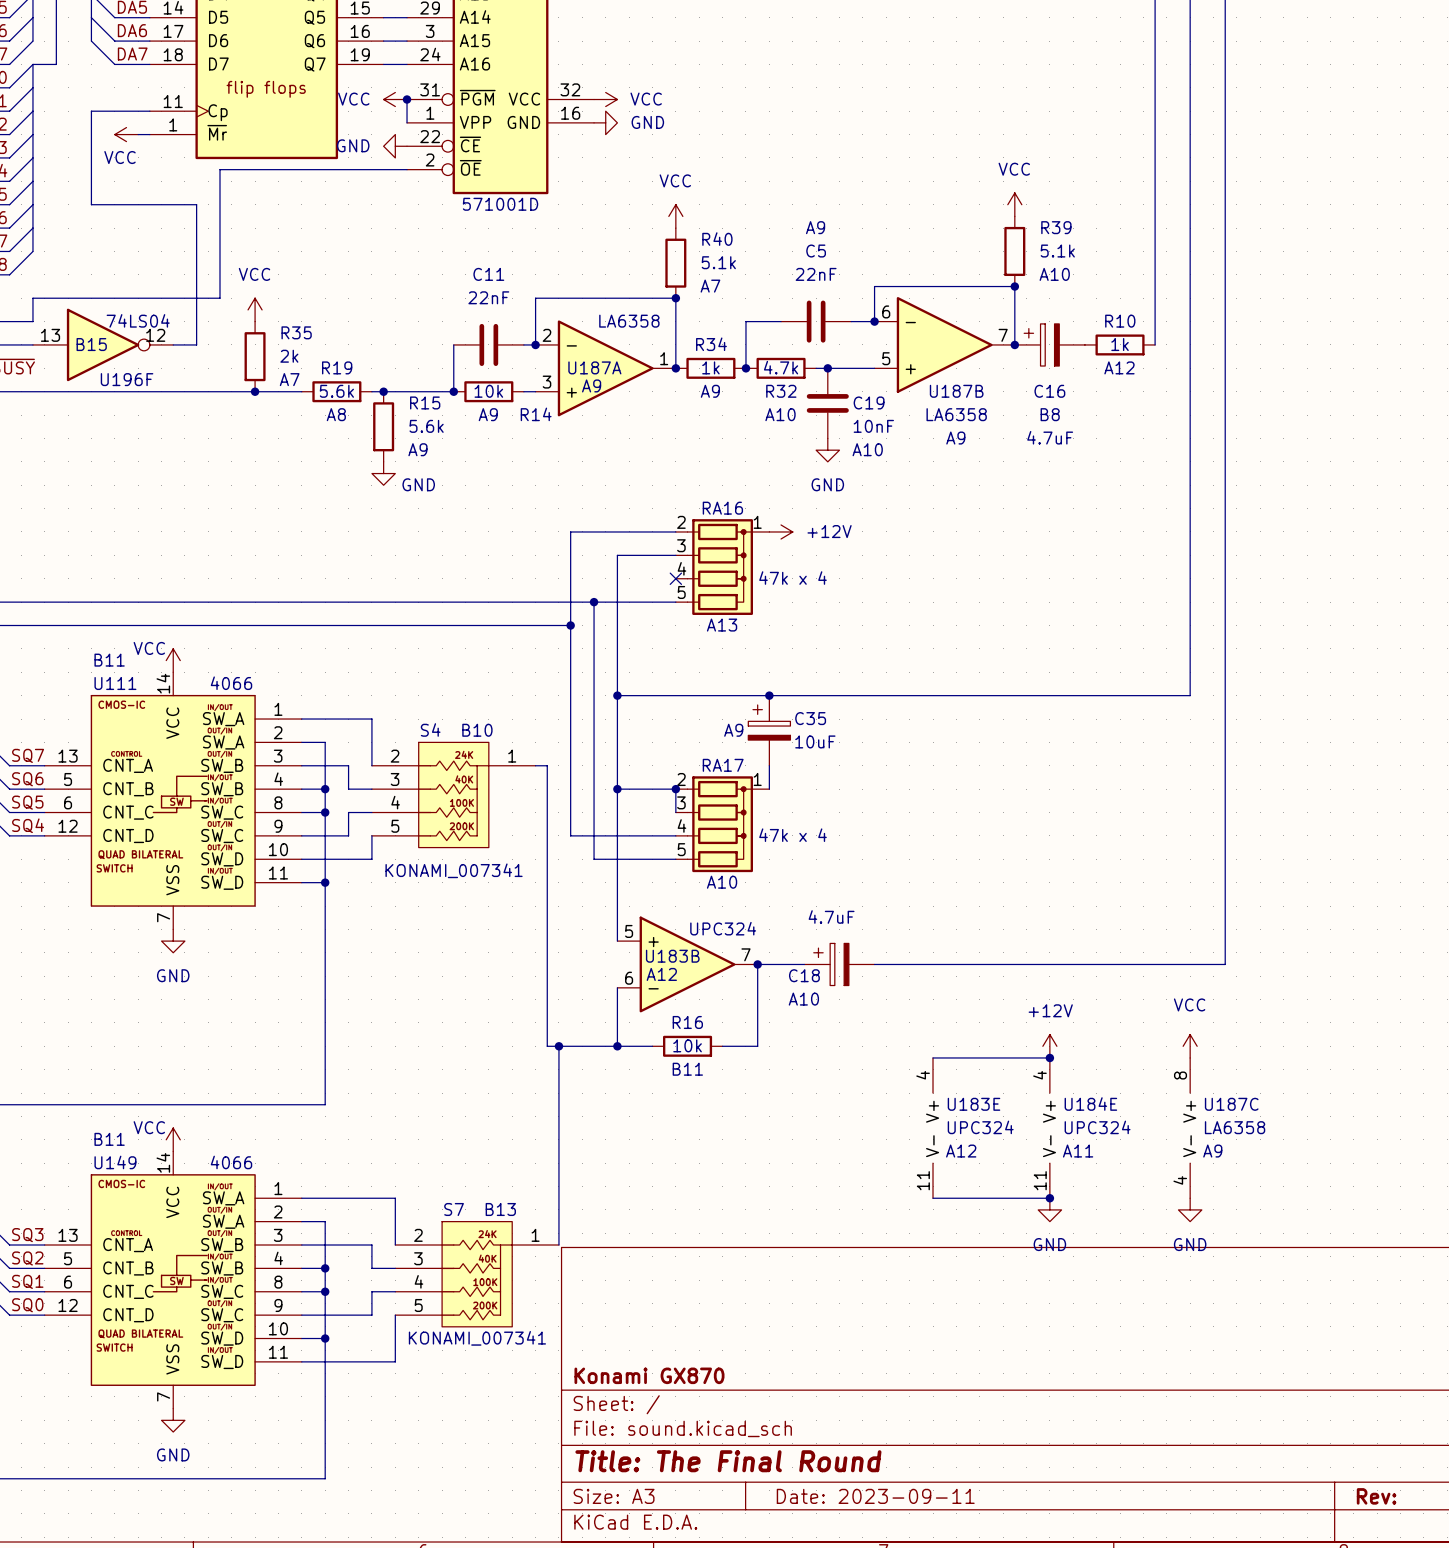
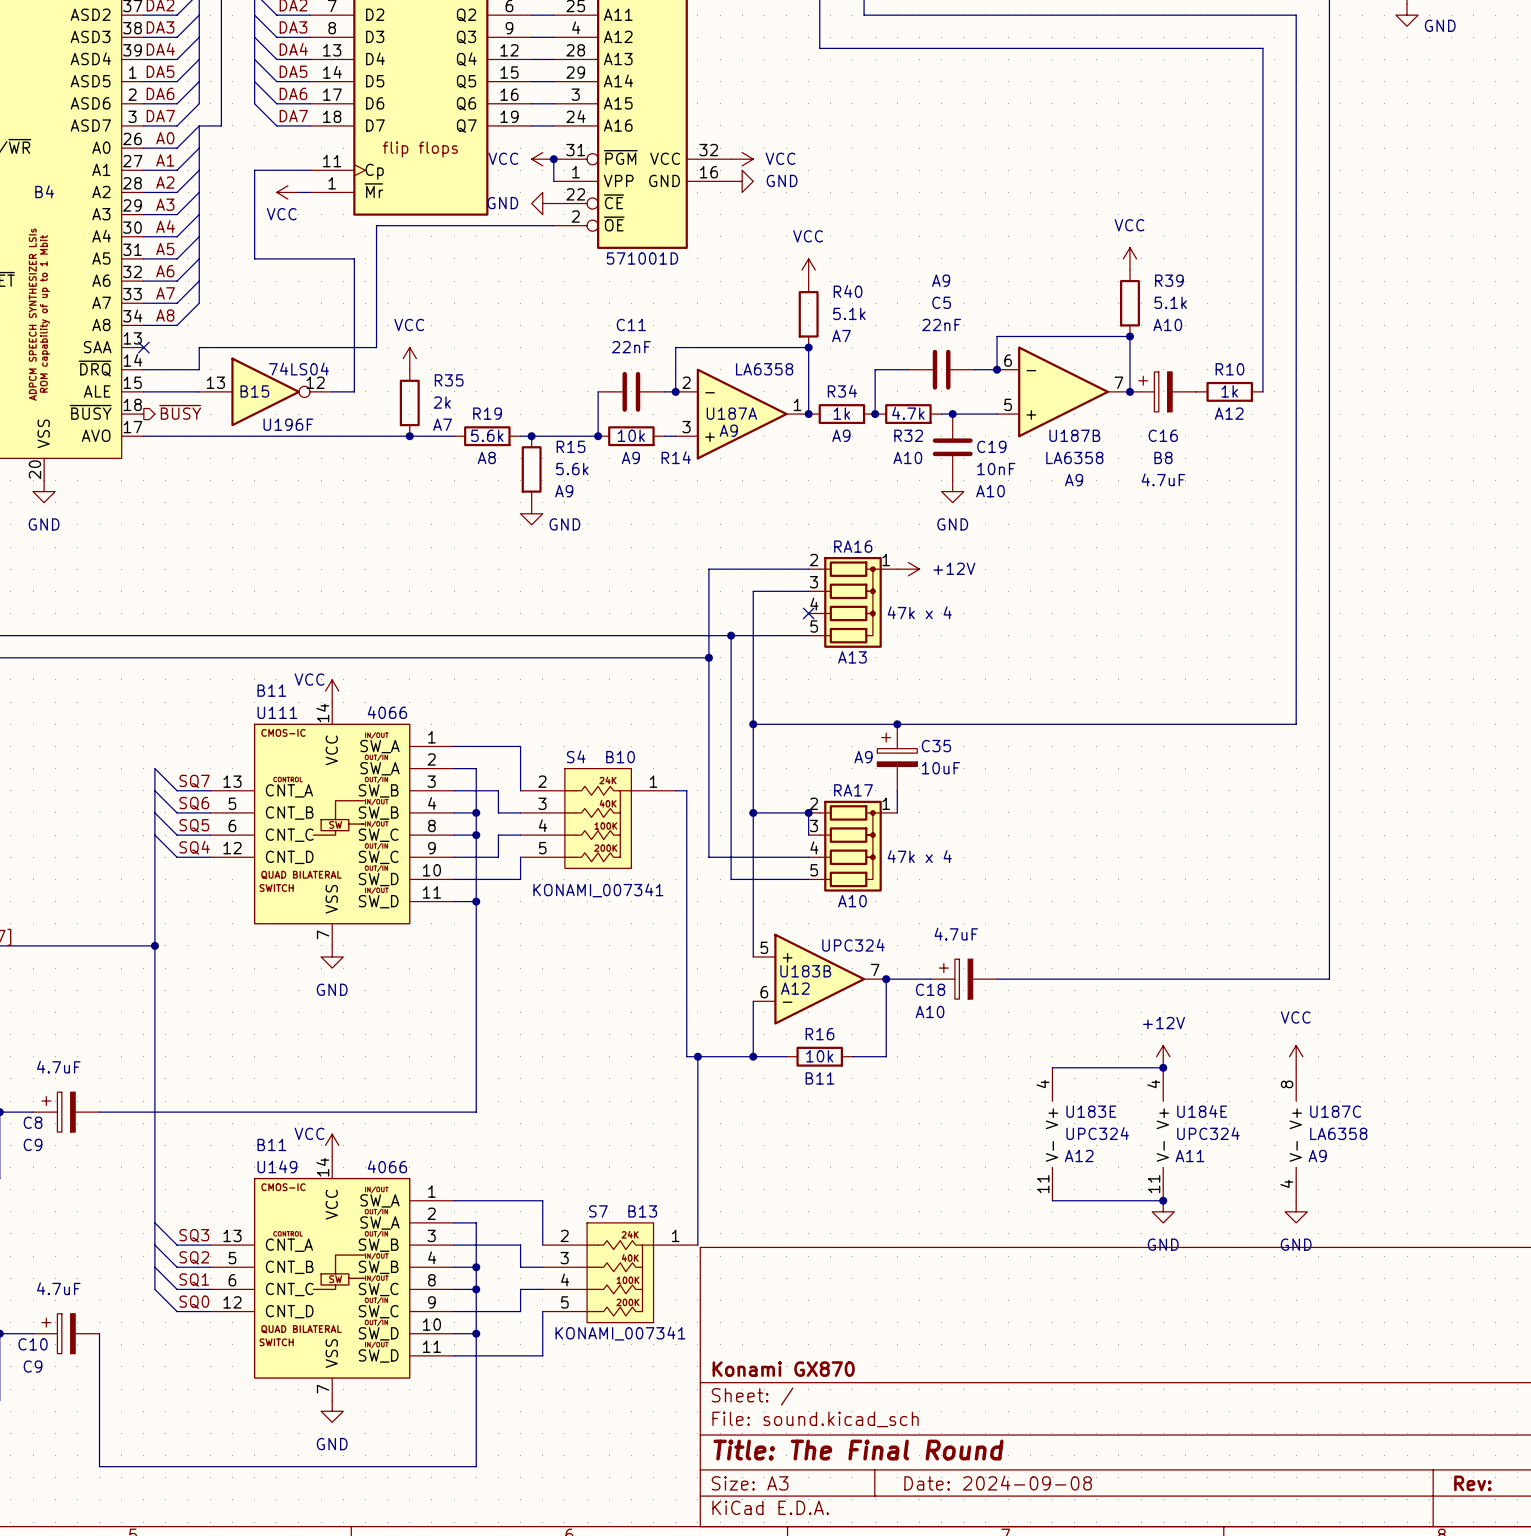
title block: Date: 2023-09-11 (875, 1496) -> Date: 2024-09-08 (998, 1483)

